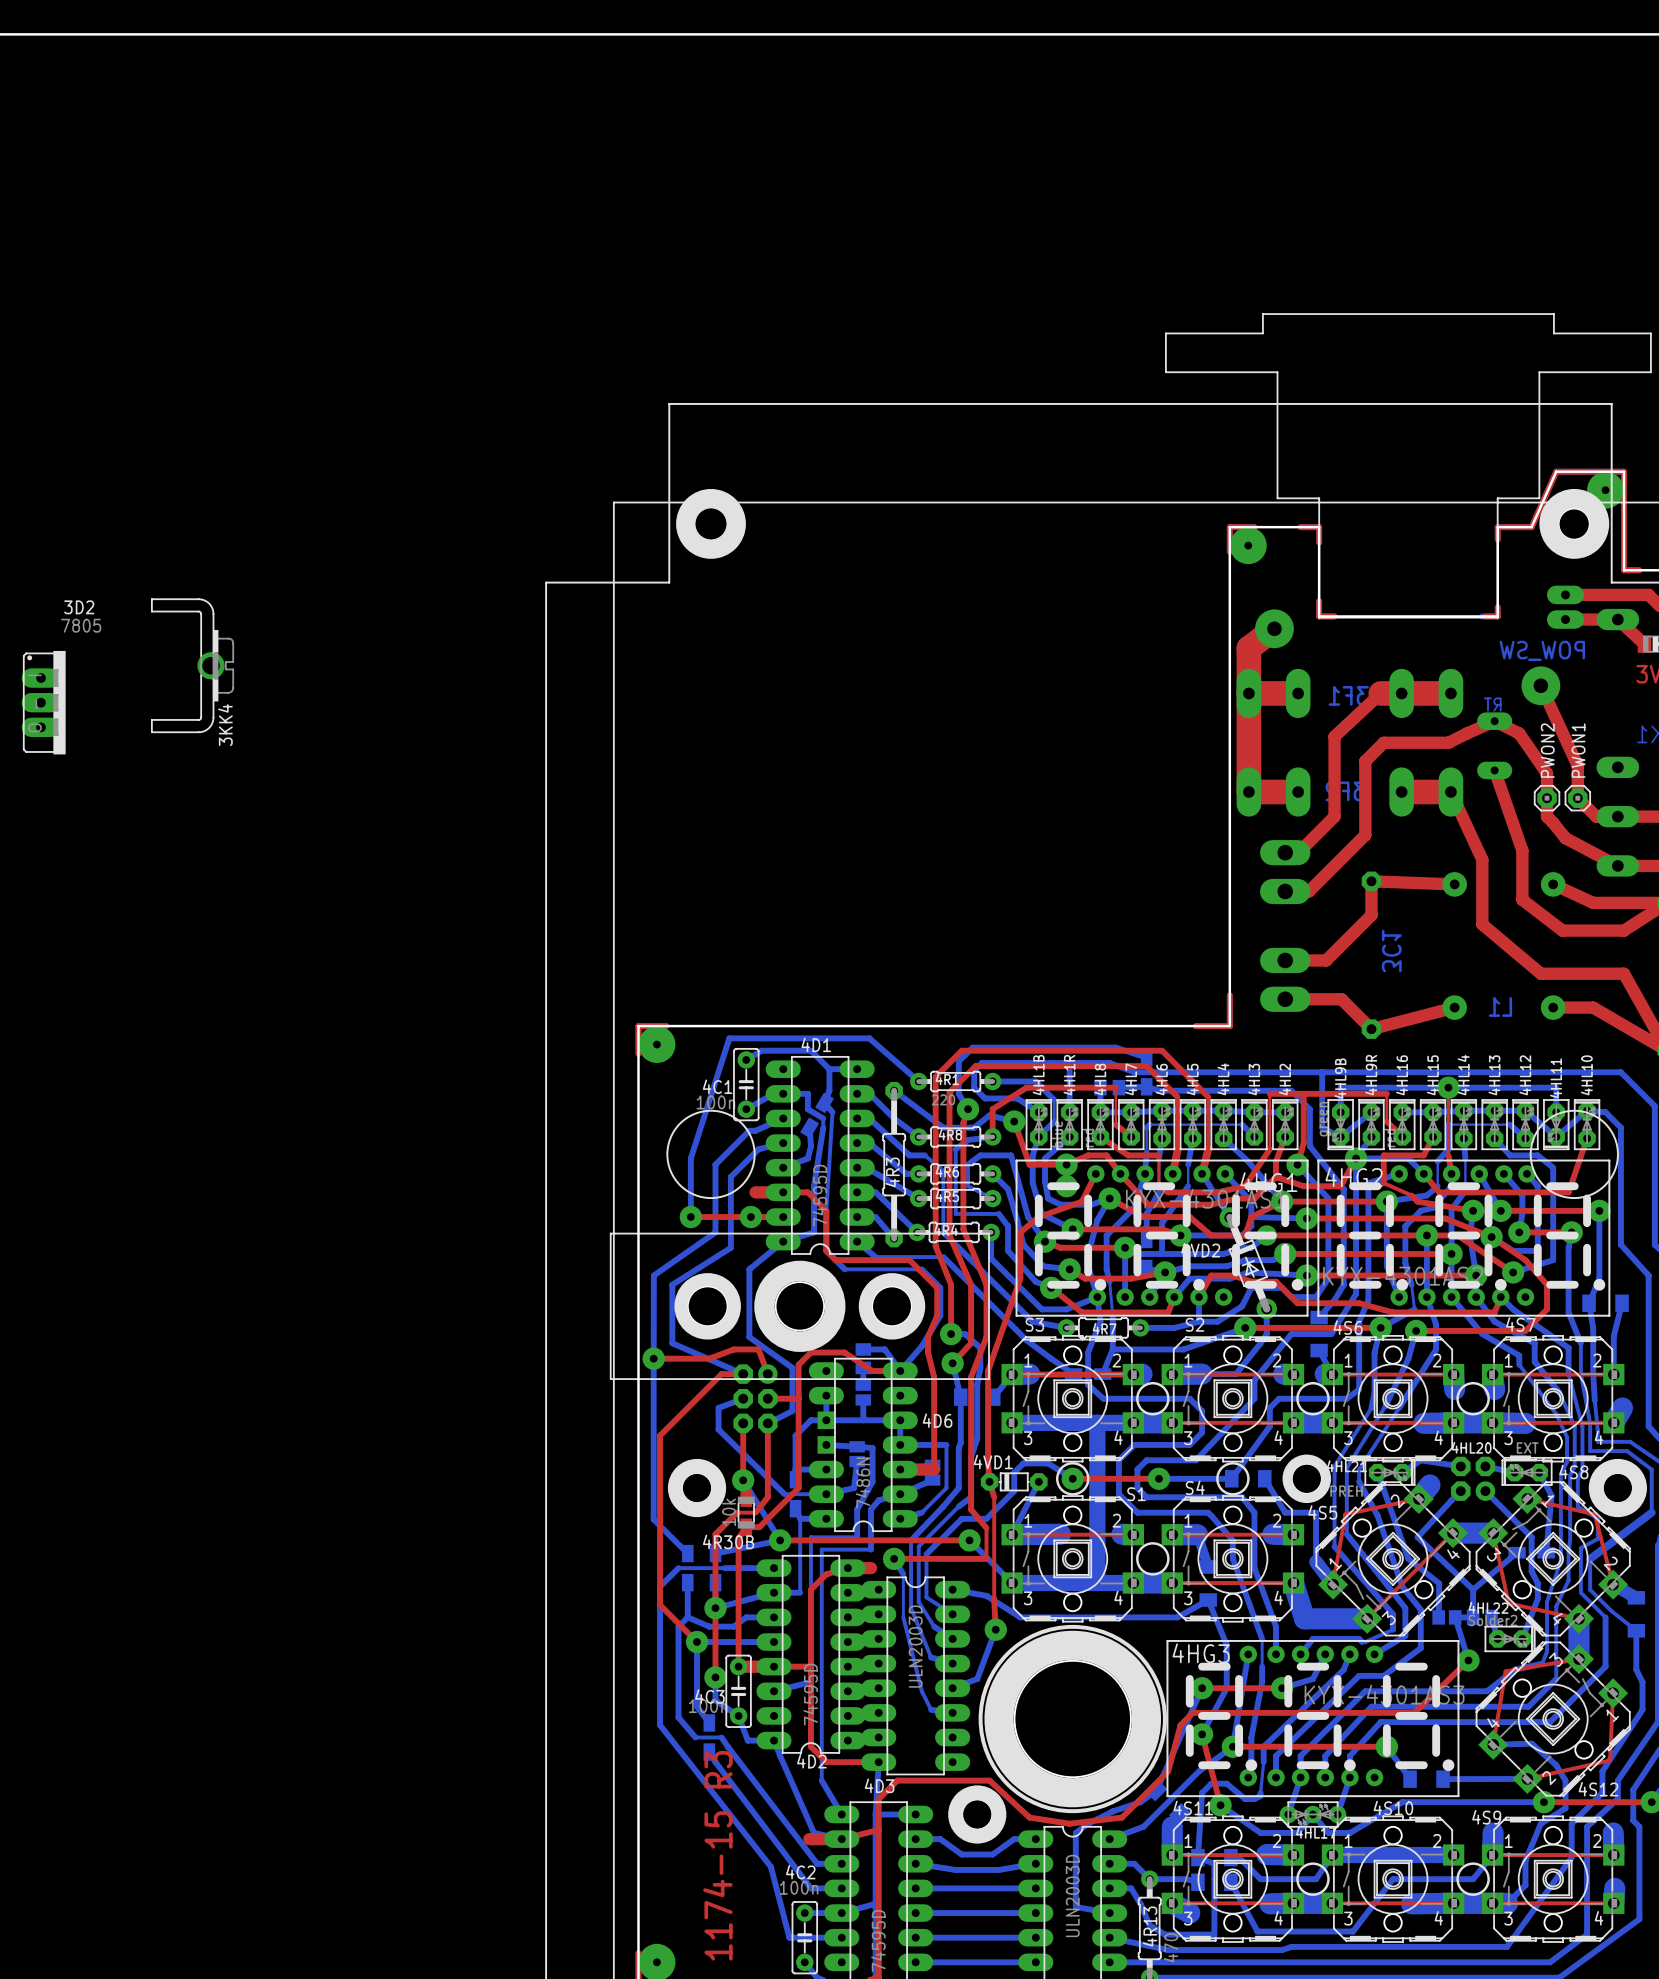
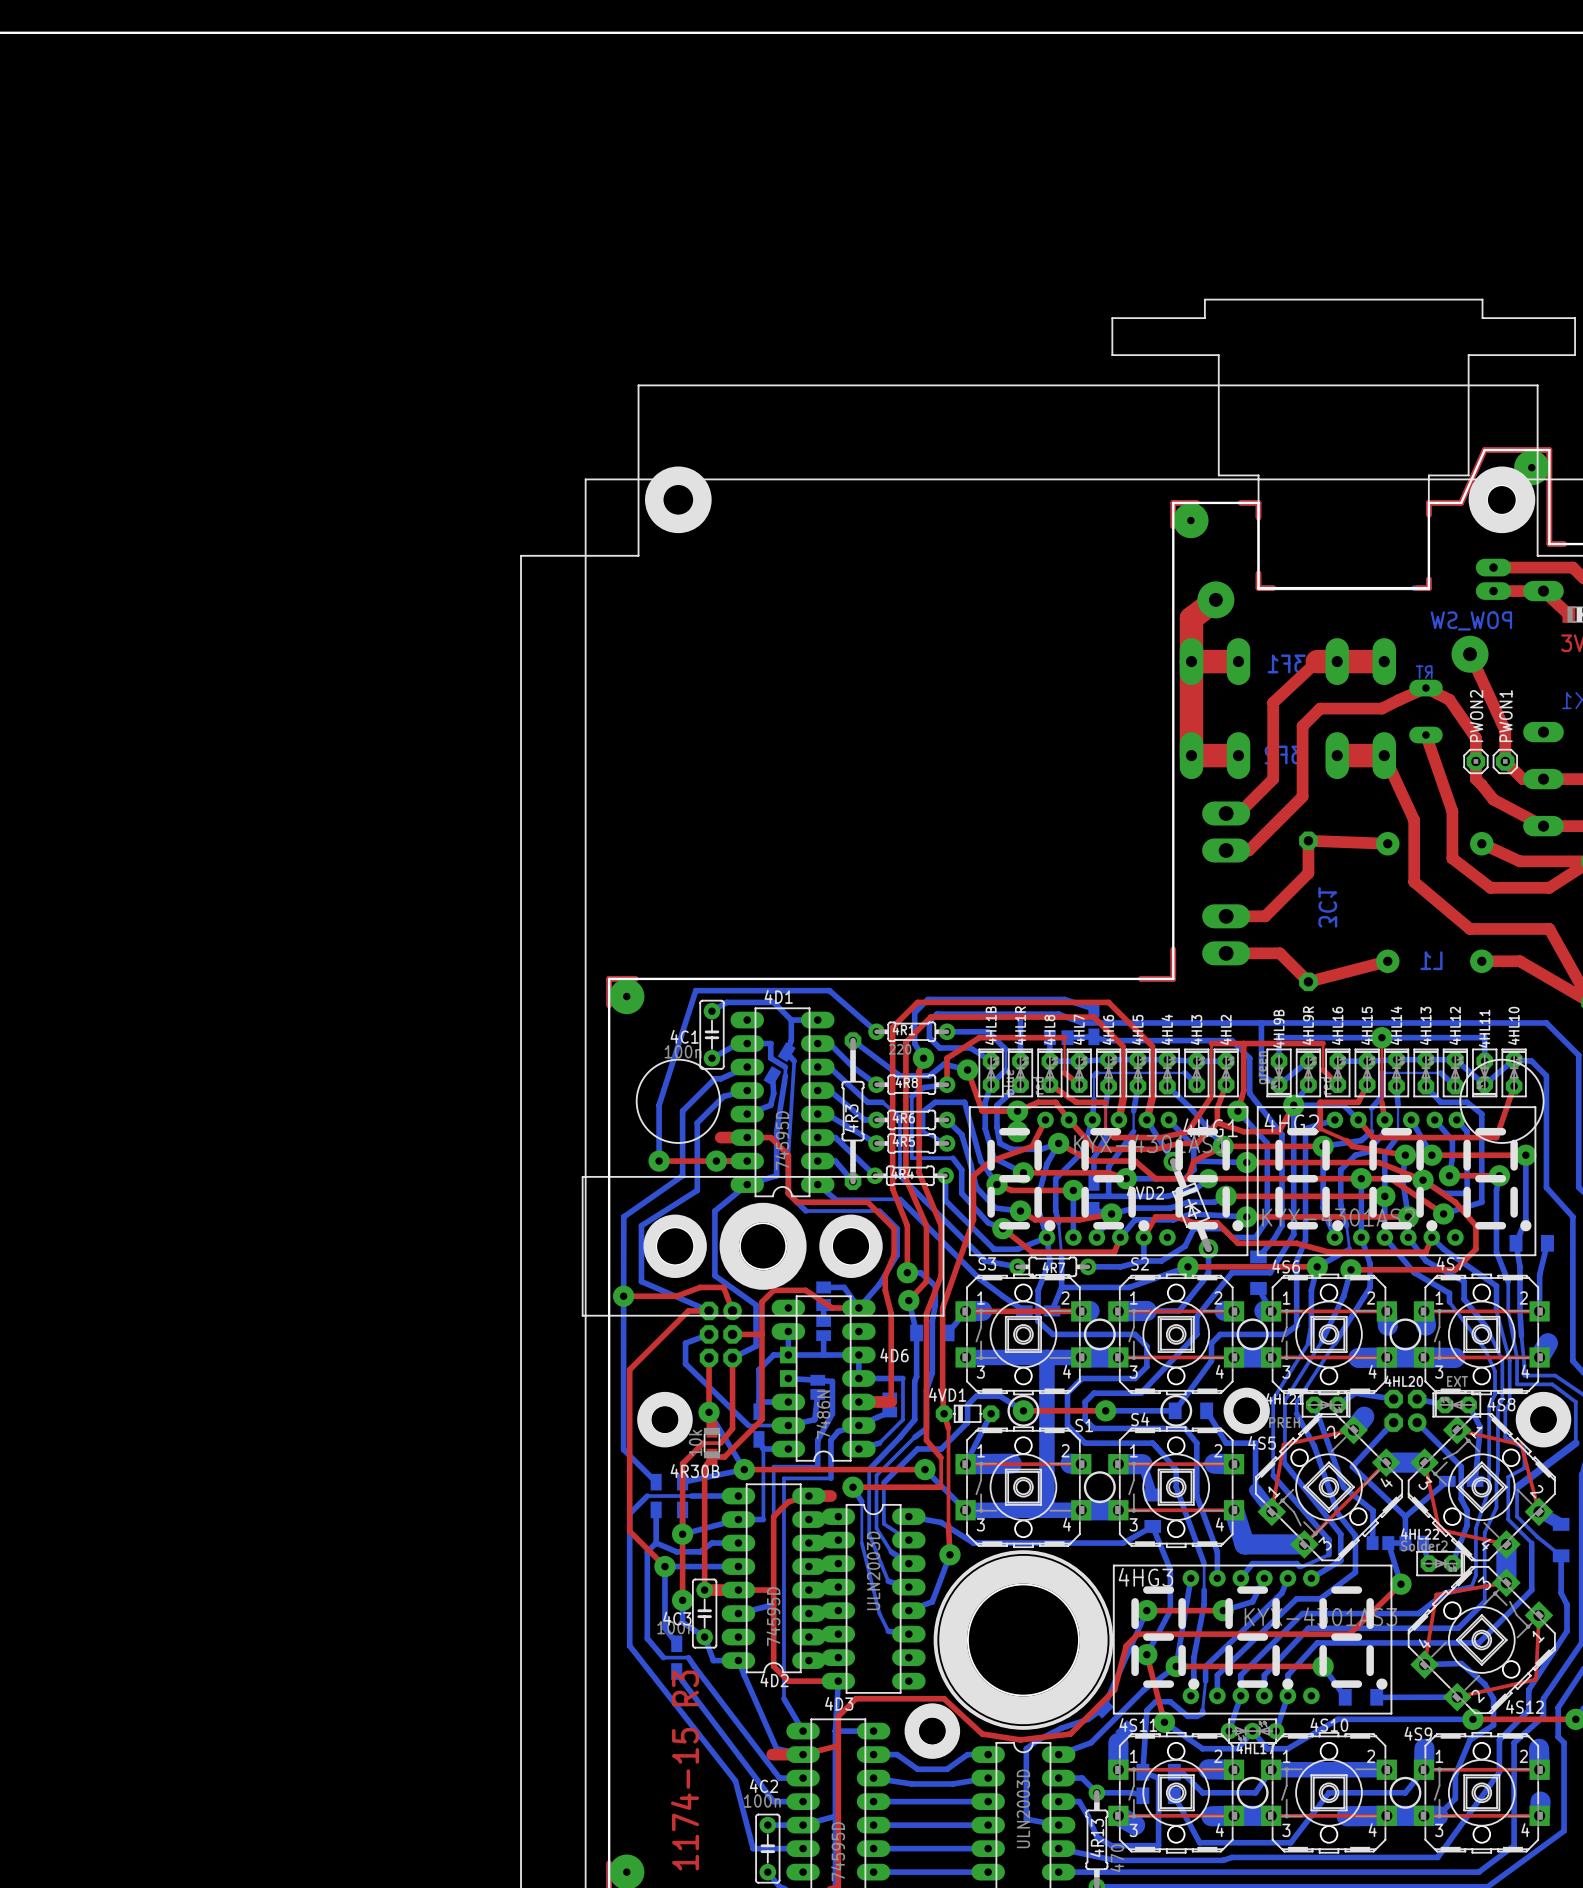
3KK4: (192, 665) -> none
3D2: 7805 (43, 702) -> none

